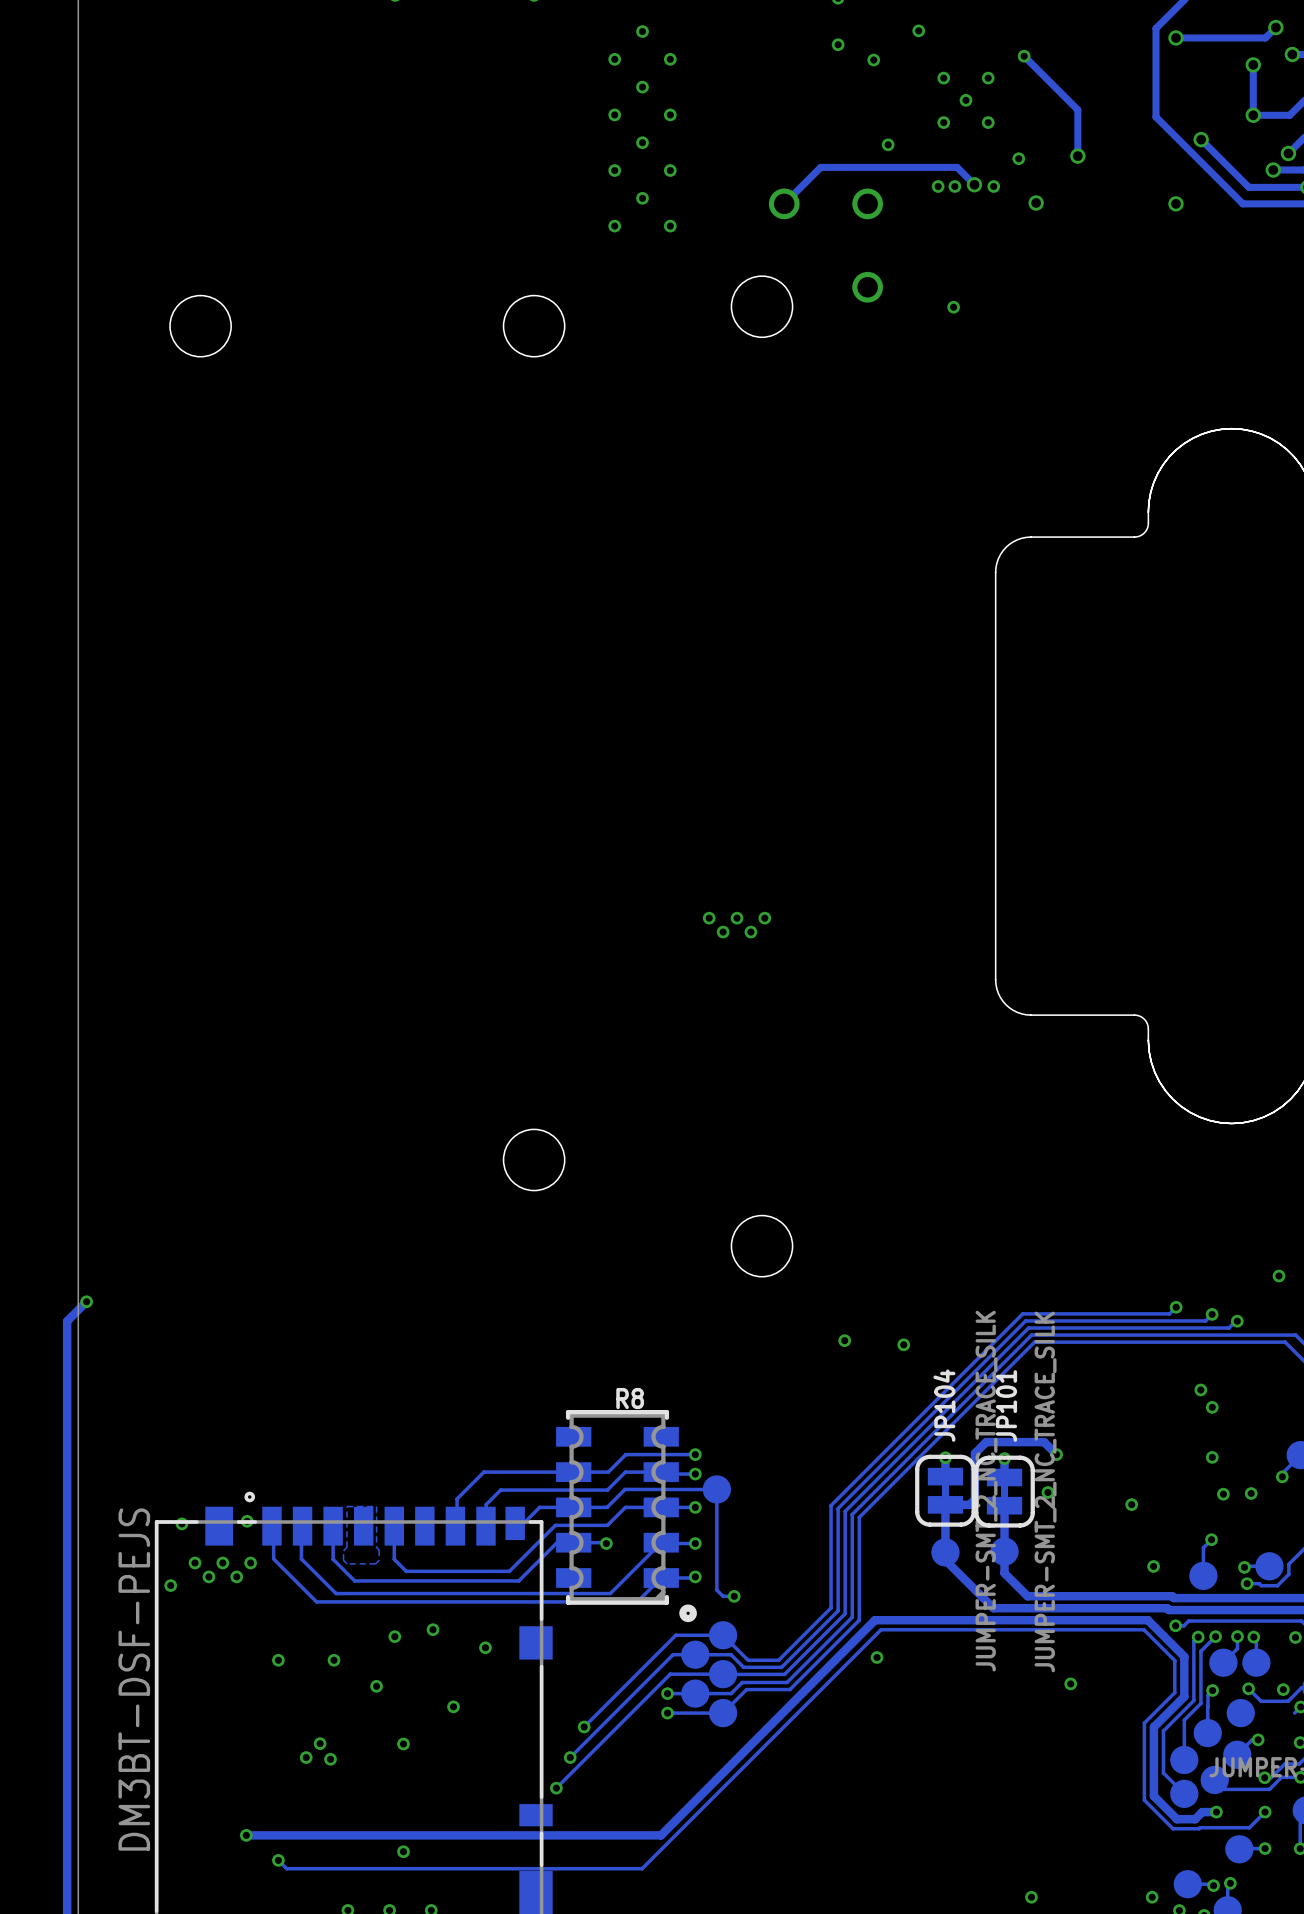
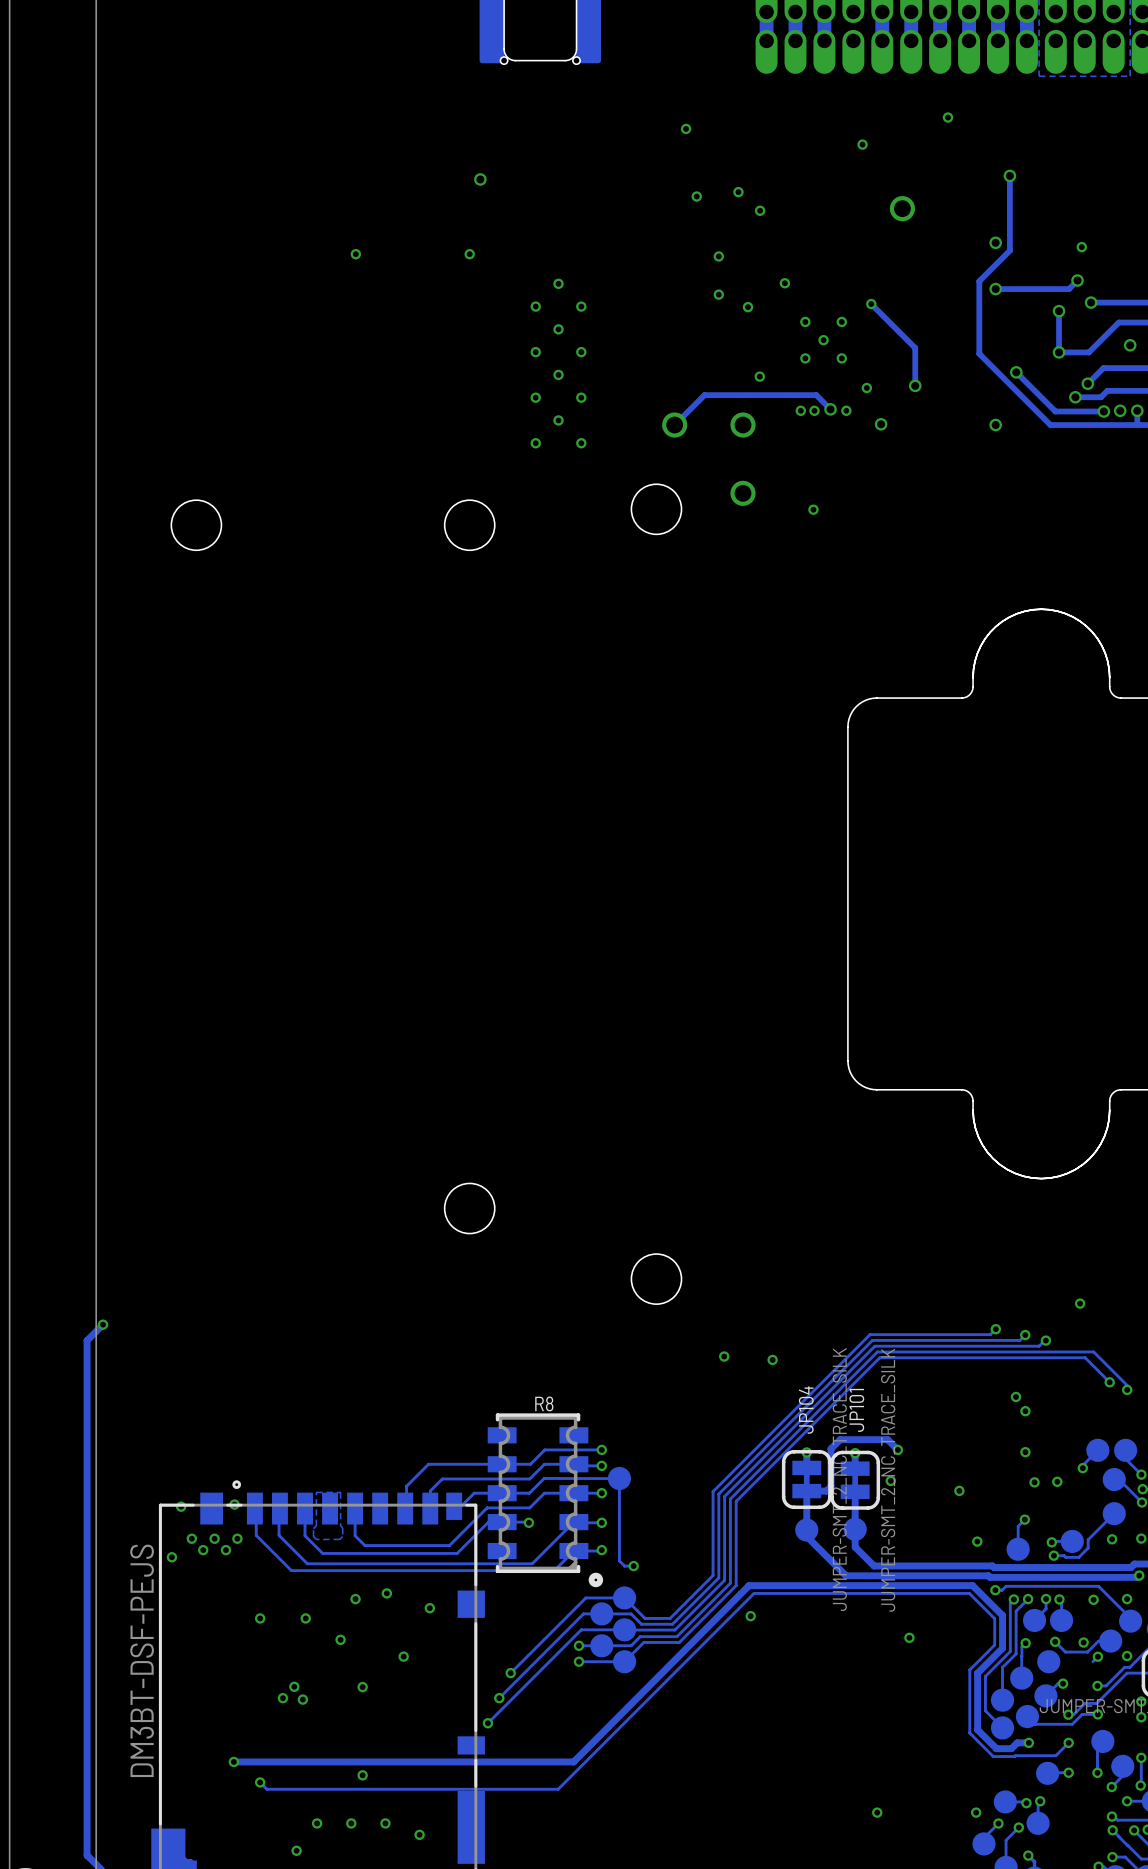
via: (709, 918) -> none
via: (737, 918) -> none
via: (764, 918) -> none
via: (723, 932) -> none
via: (750, 932) -> none

